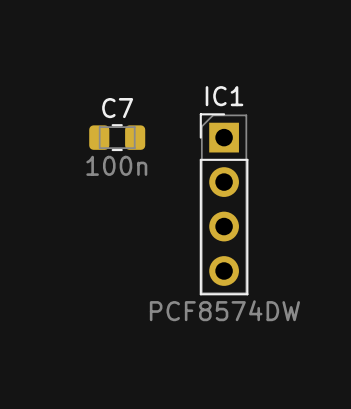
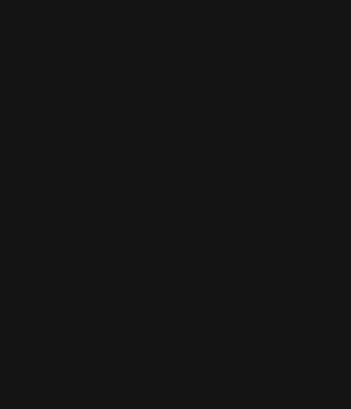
C7: 100n (117, 137) -> none
IC1: PCF8574DW (224, 204) -> none

